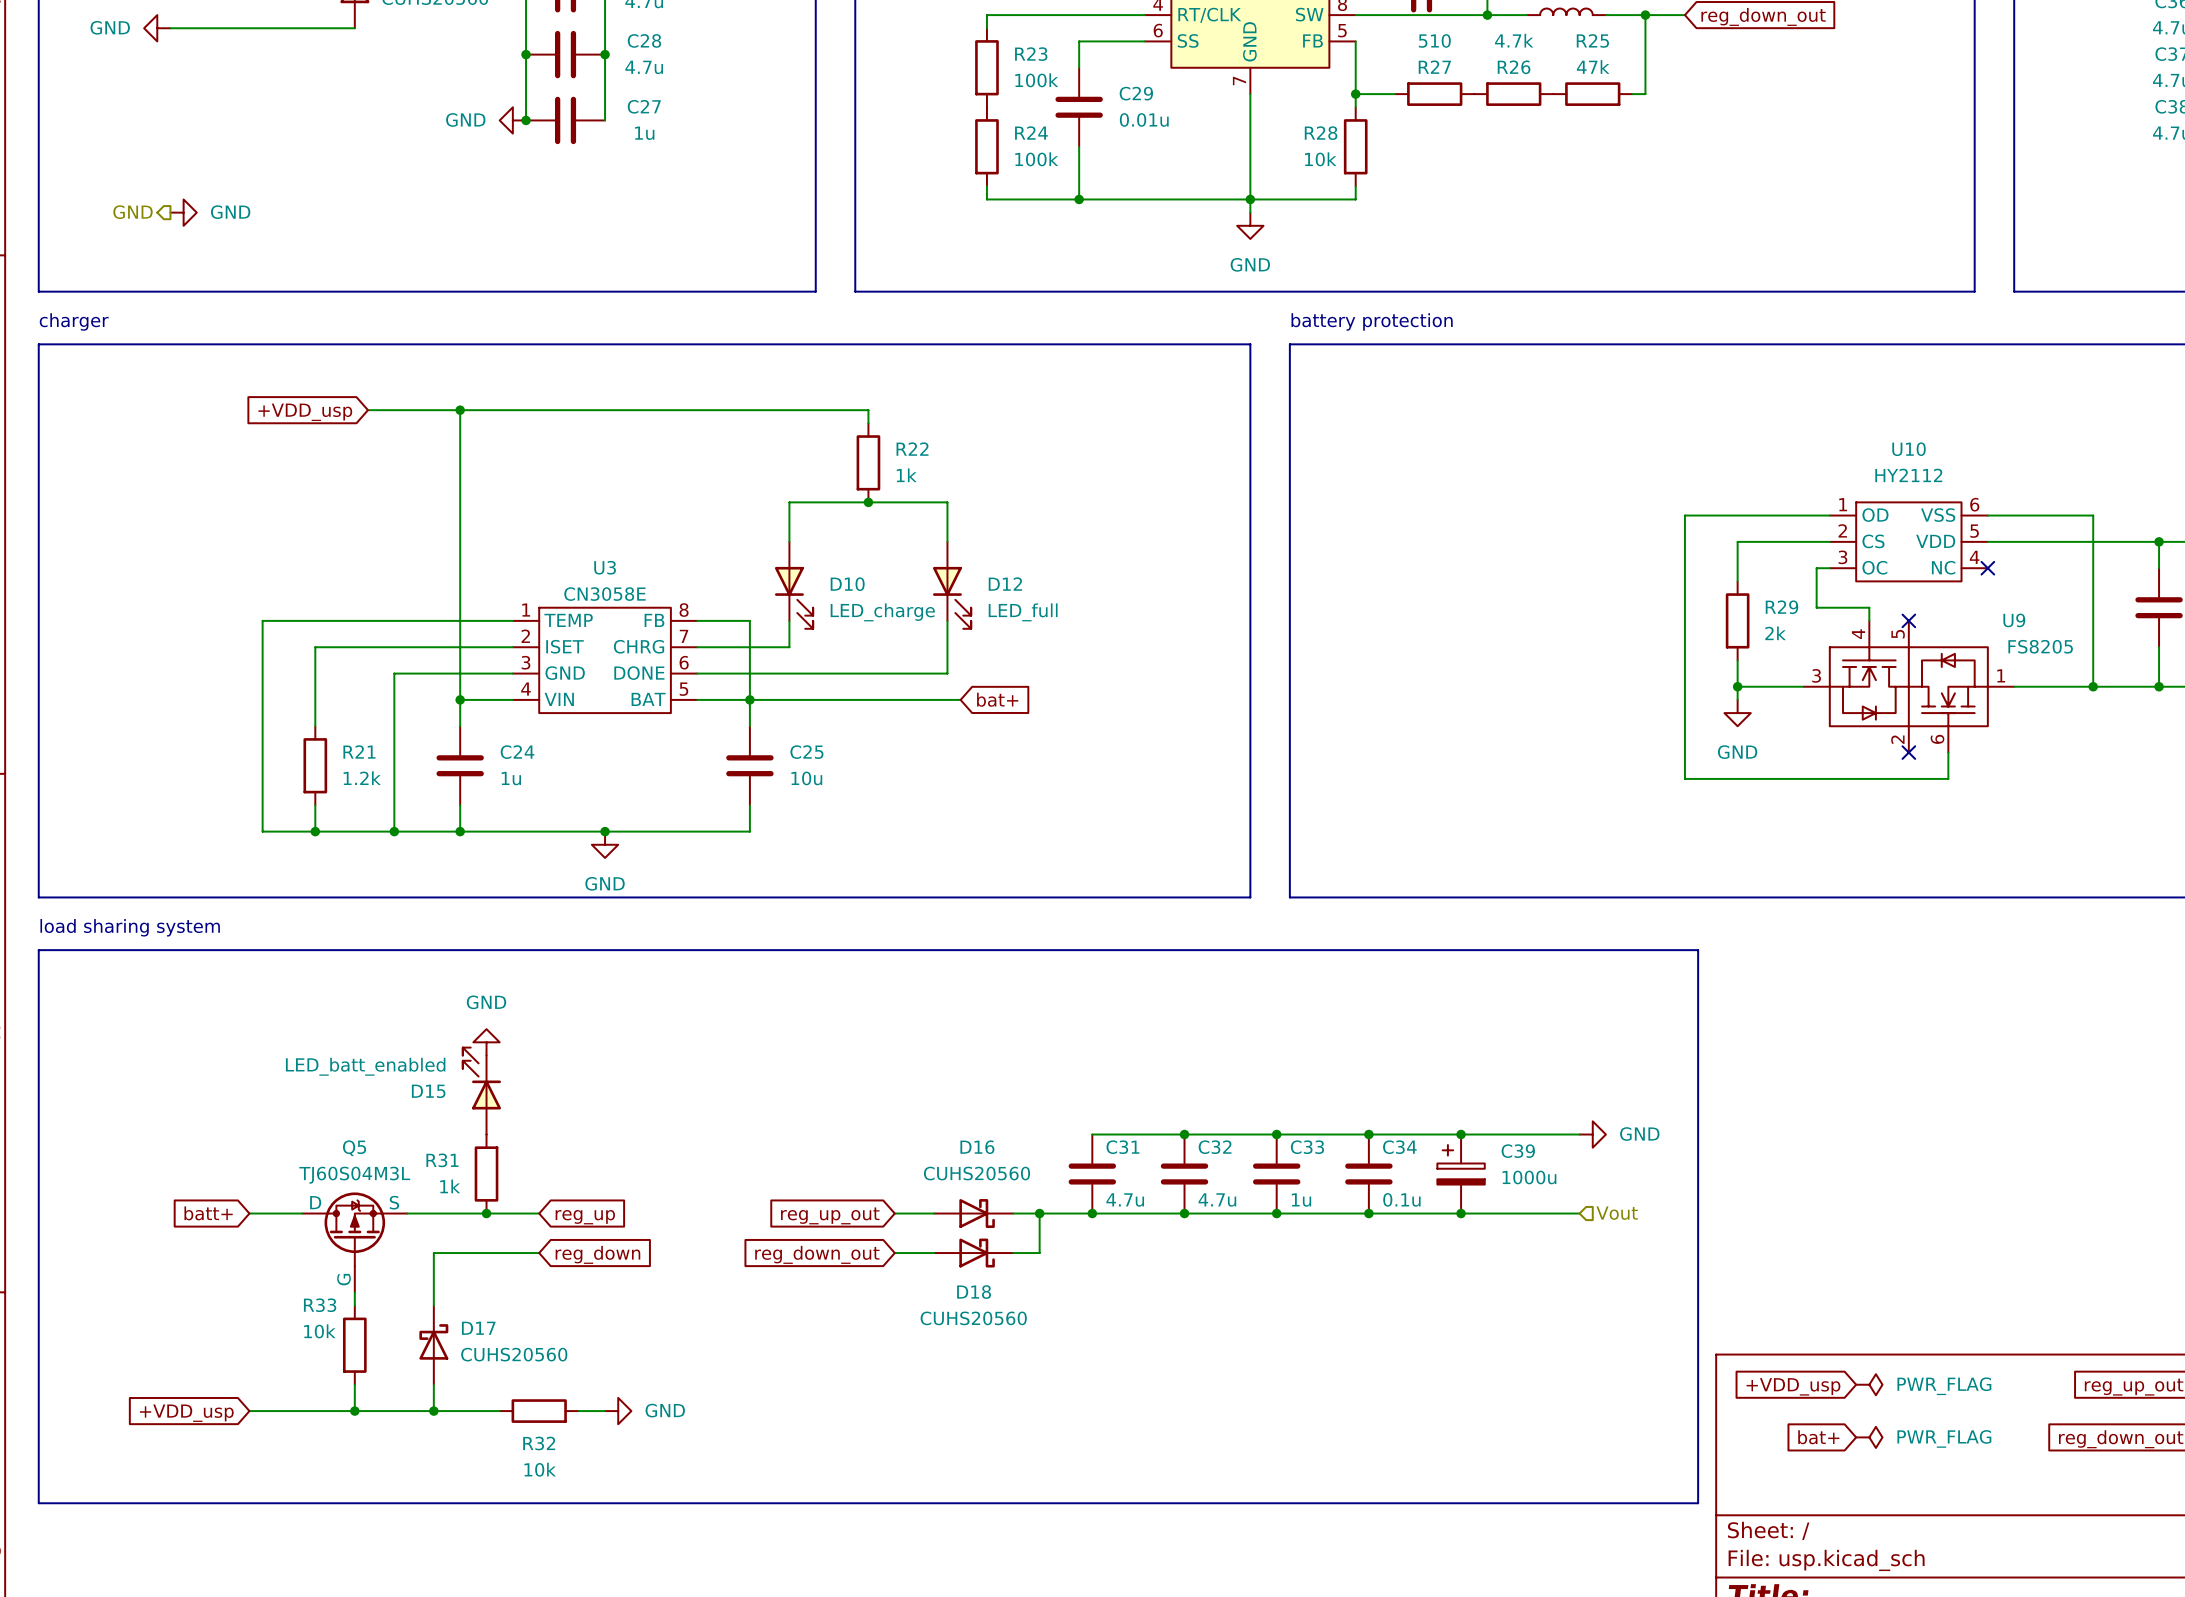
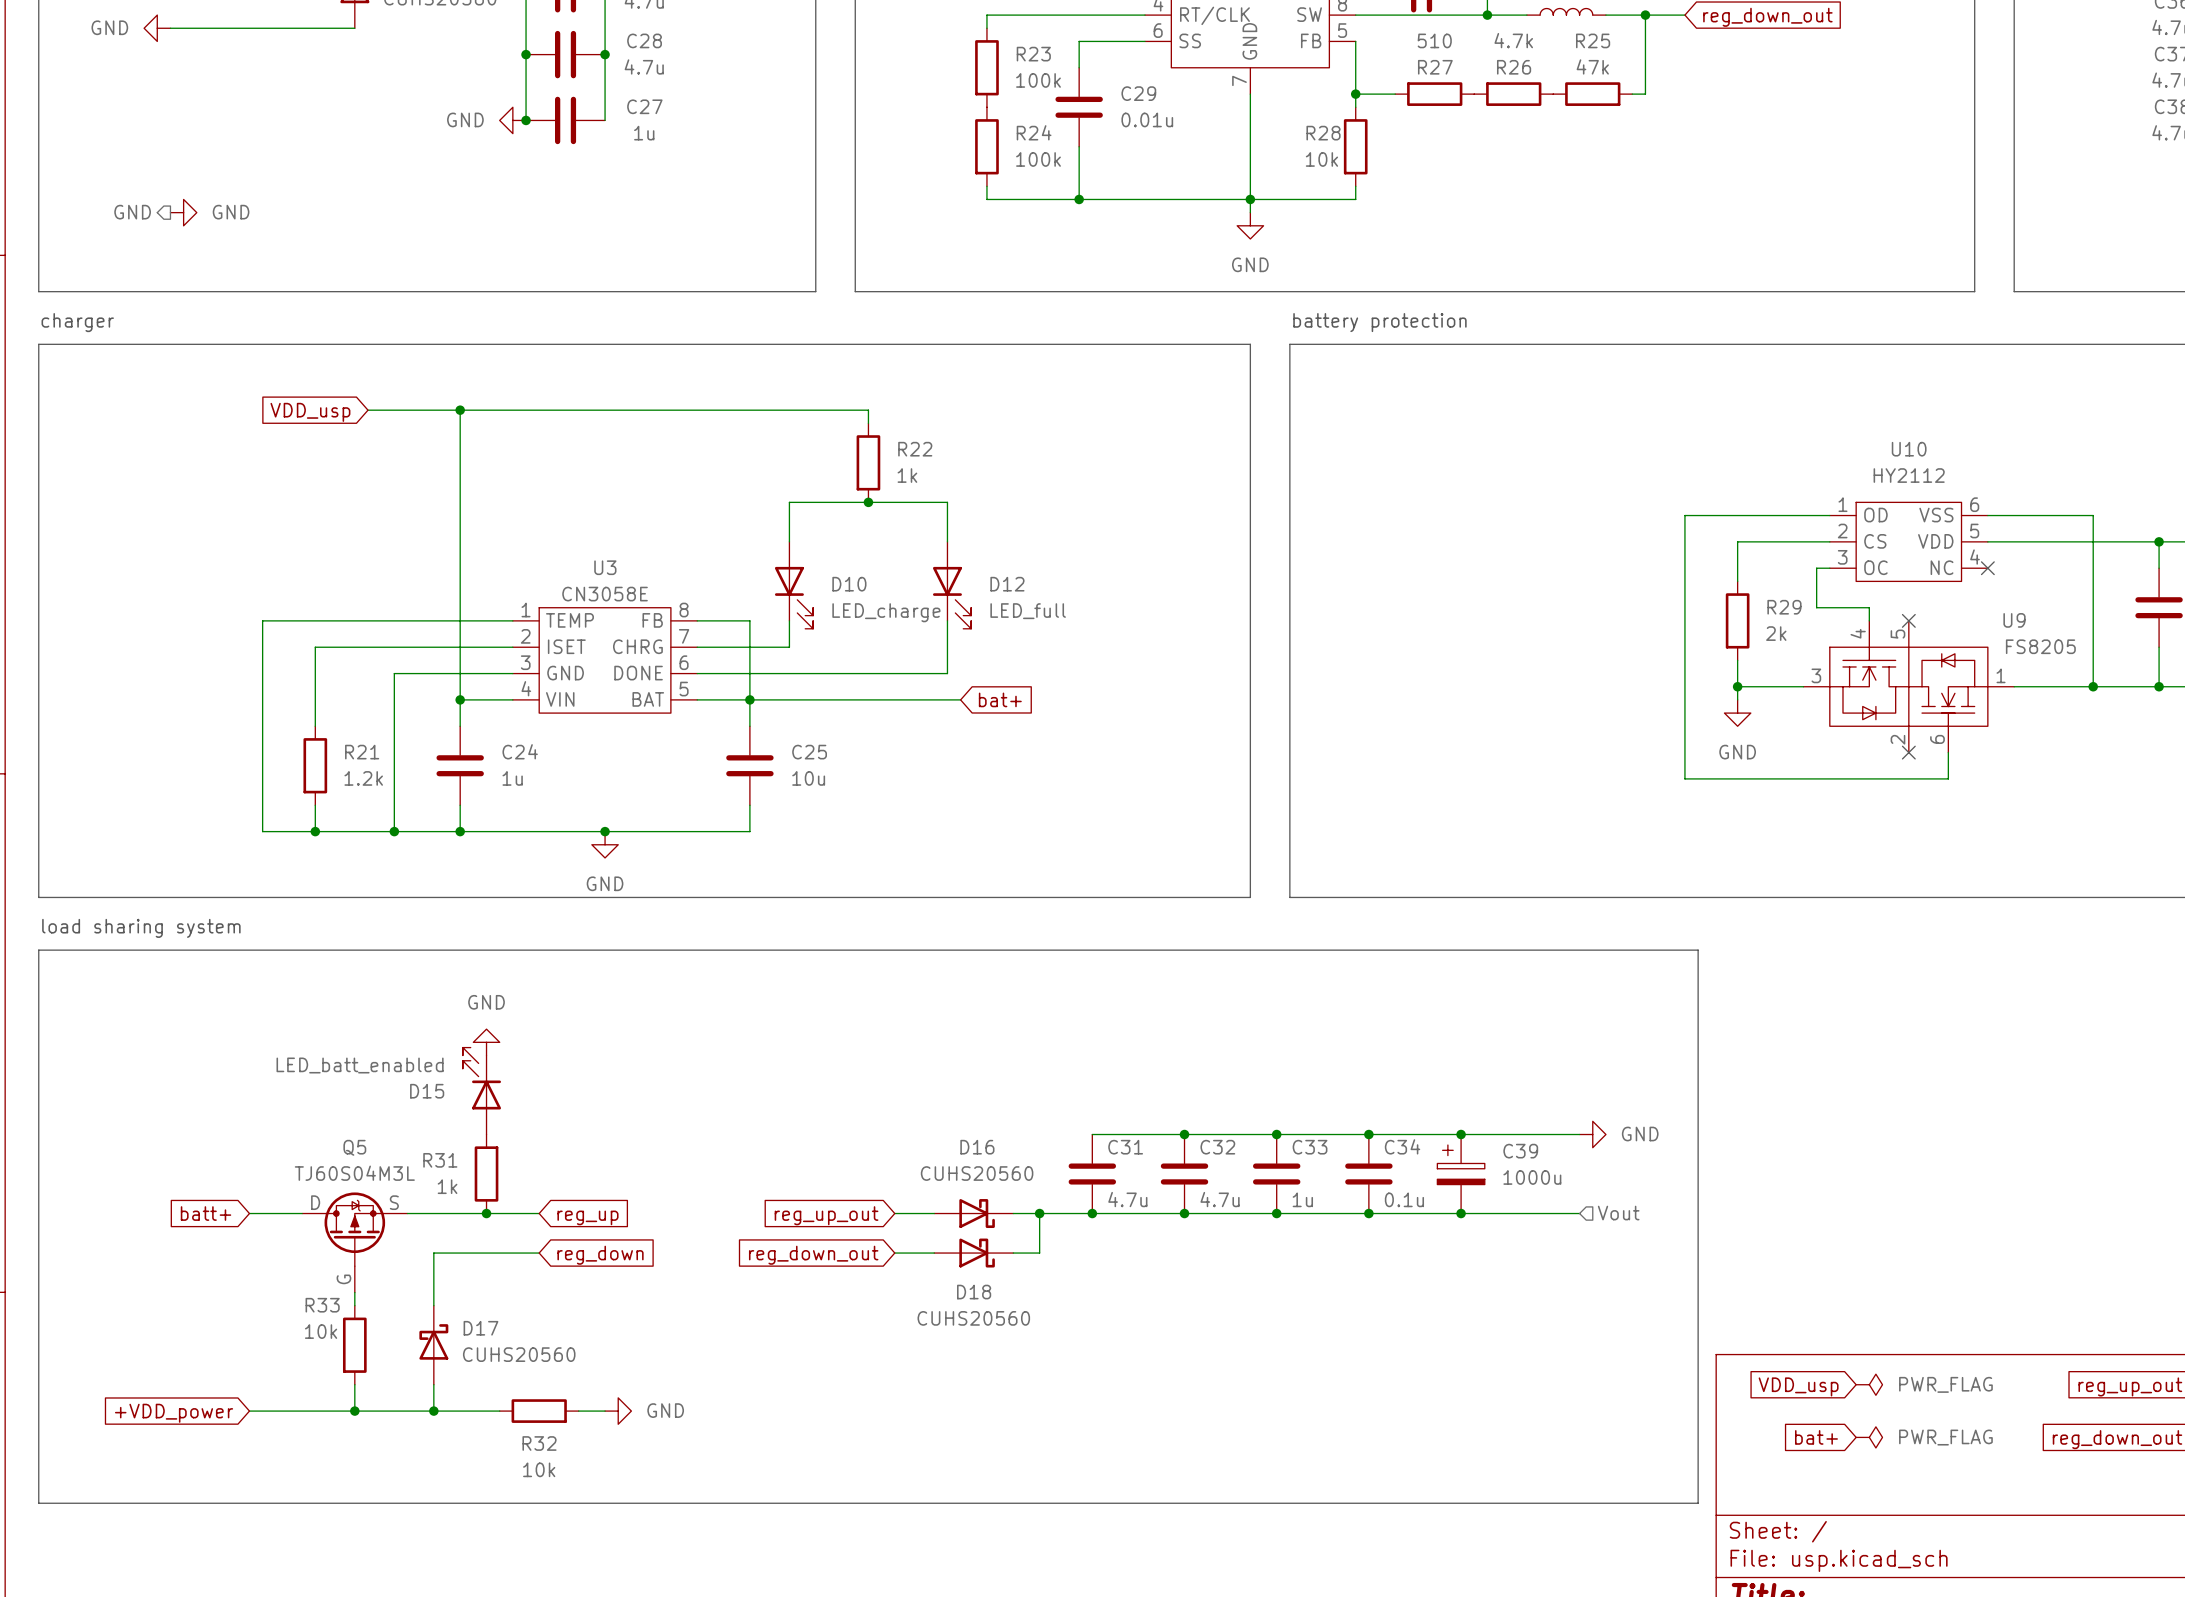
global label: +VDD_usp (305, 412) -> VDD_usp (310, 412)
global label: +VDD_usp (1793, 1386) -> VDD_usp (1798, 1386)
global label: +VDD_usp (186, 1413) -> +VDD_power (174, 1413)

